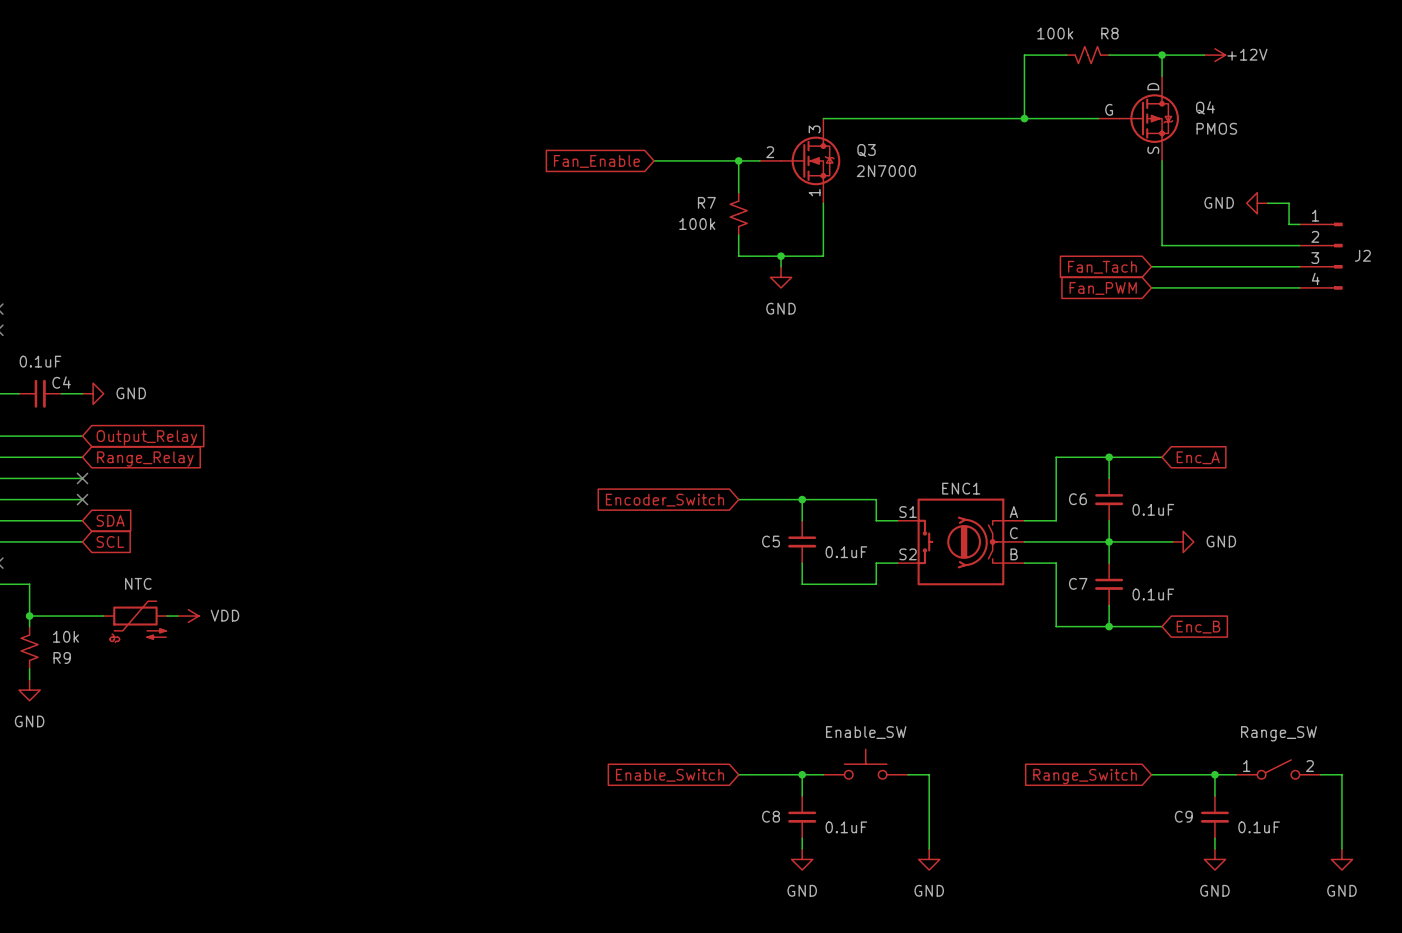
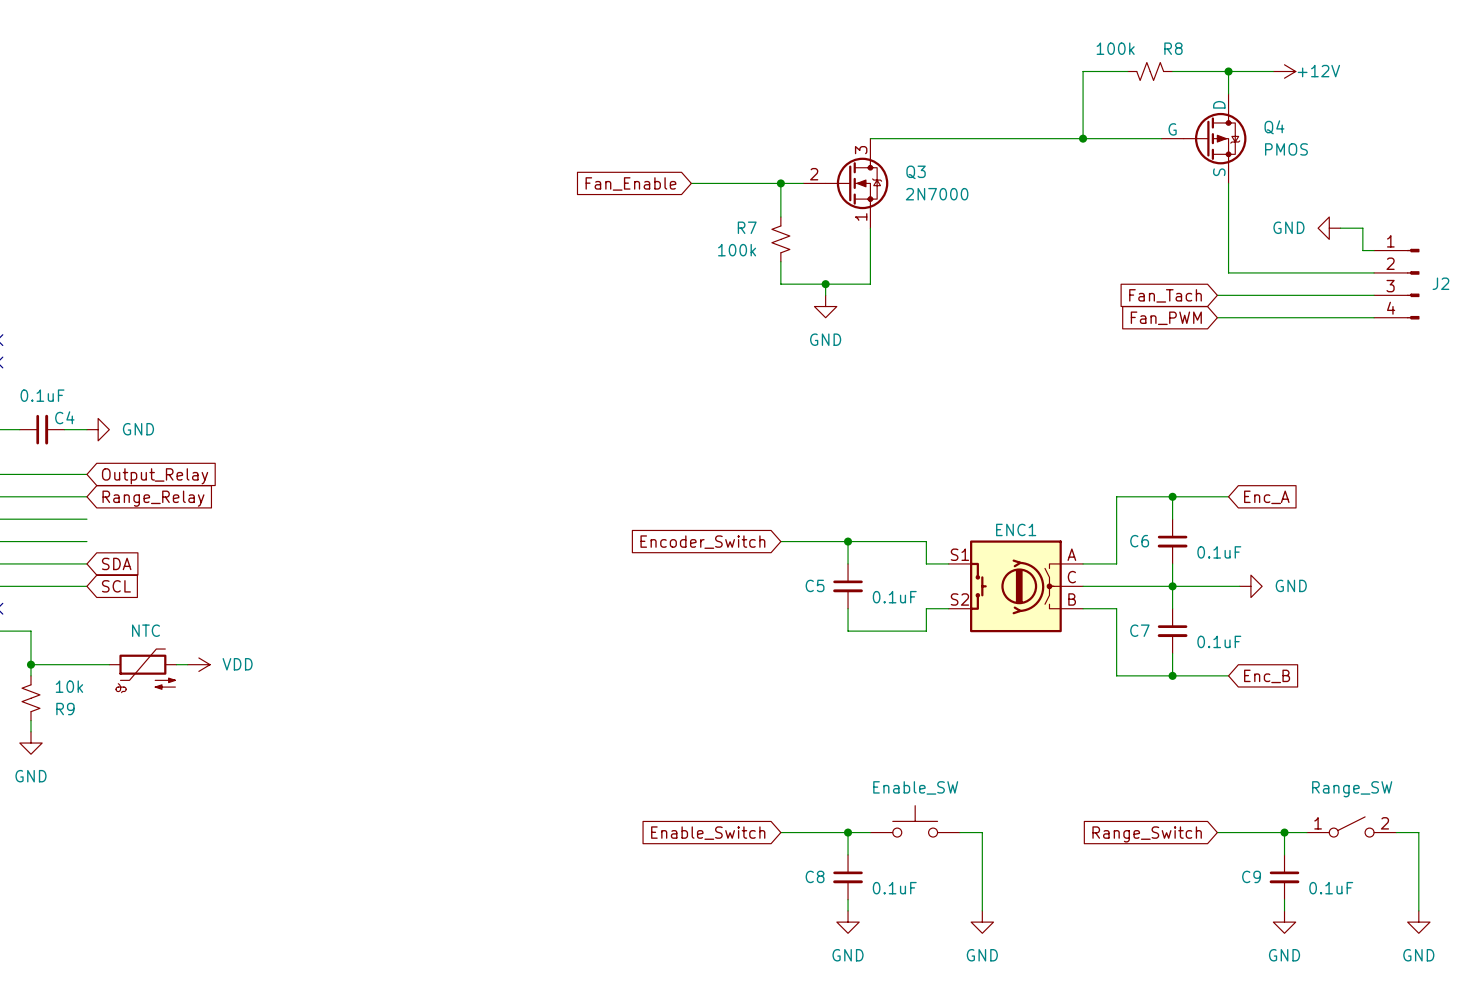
no-connect mark: (82, 478) -> none
no-connect mark: (82, 499) -> none

